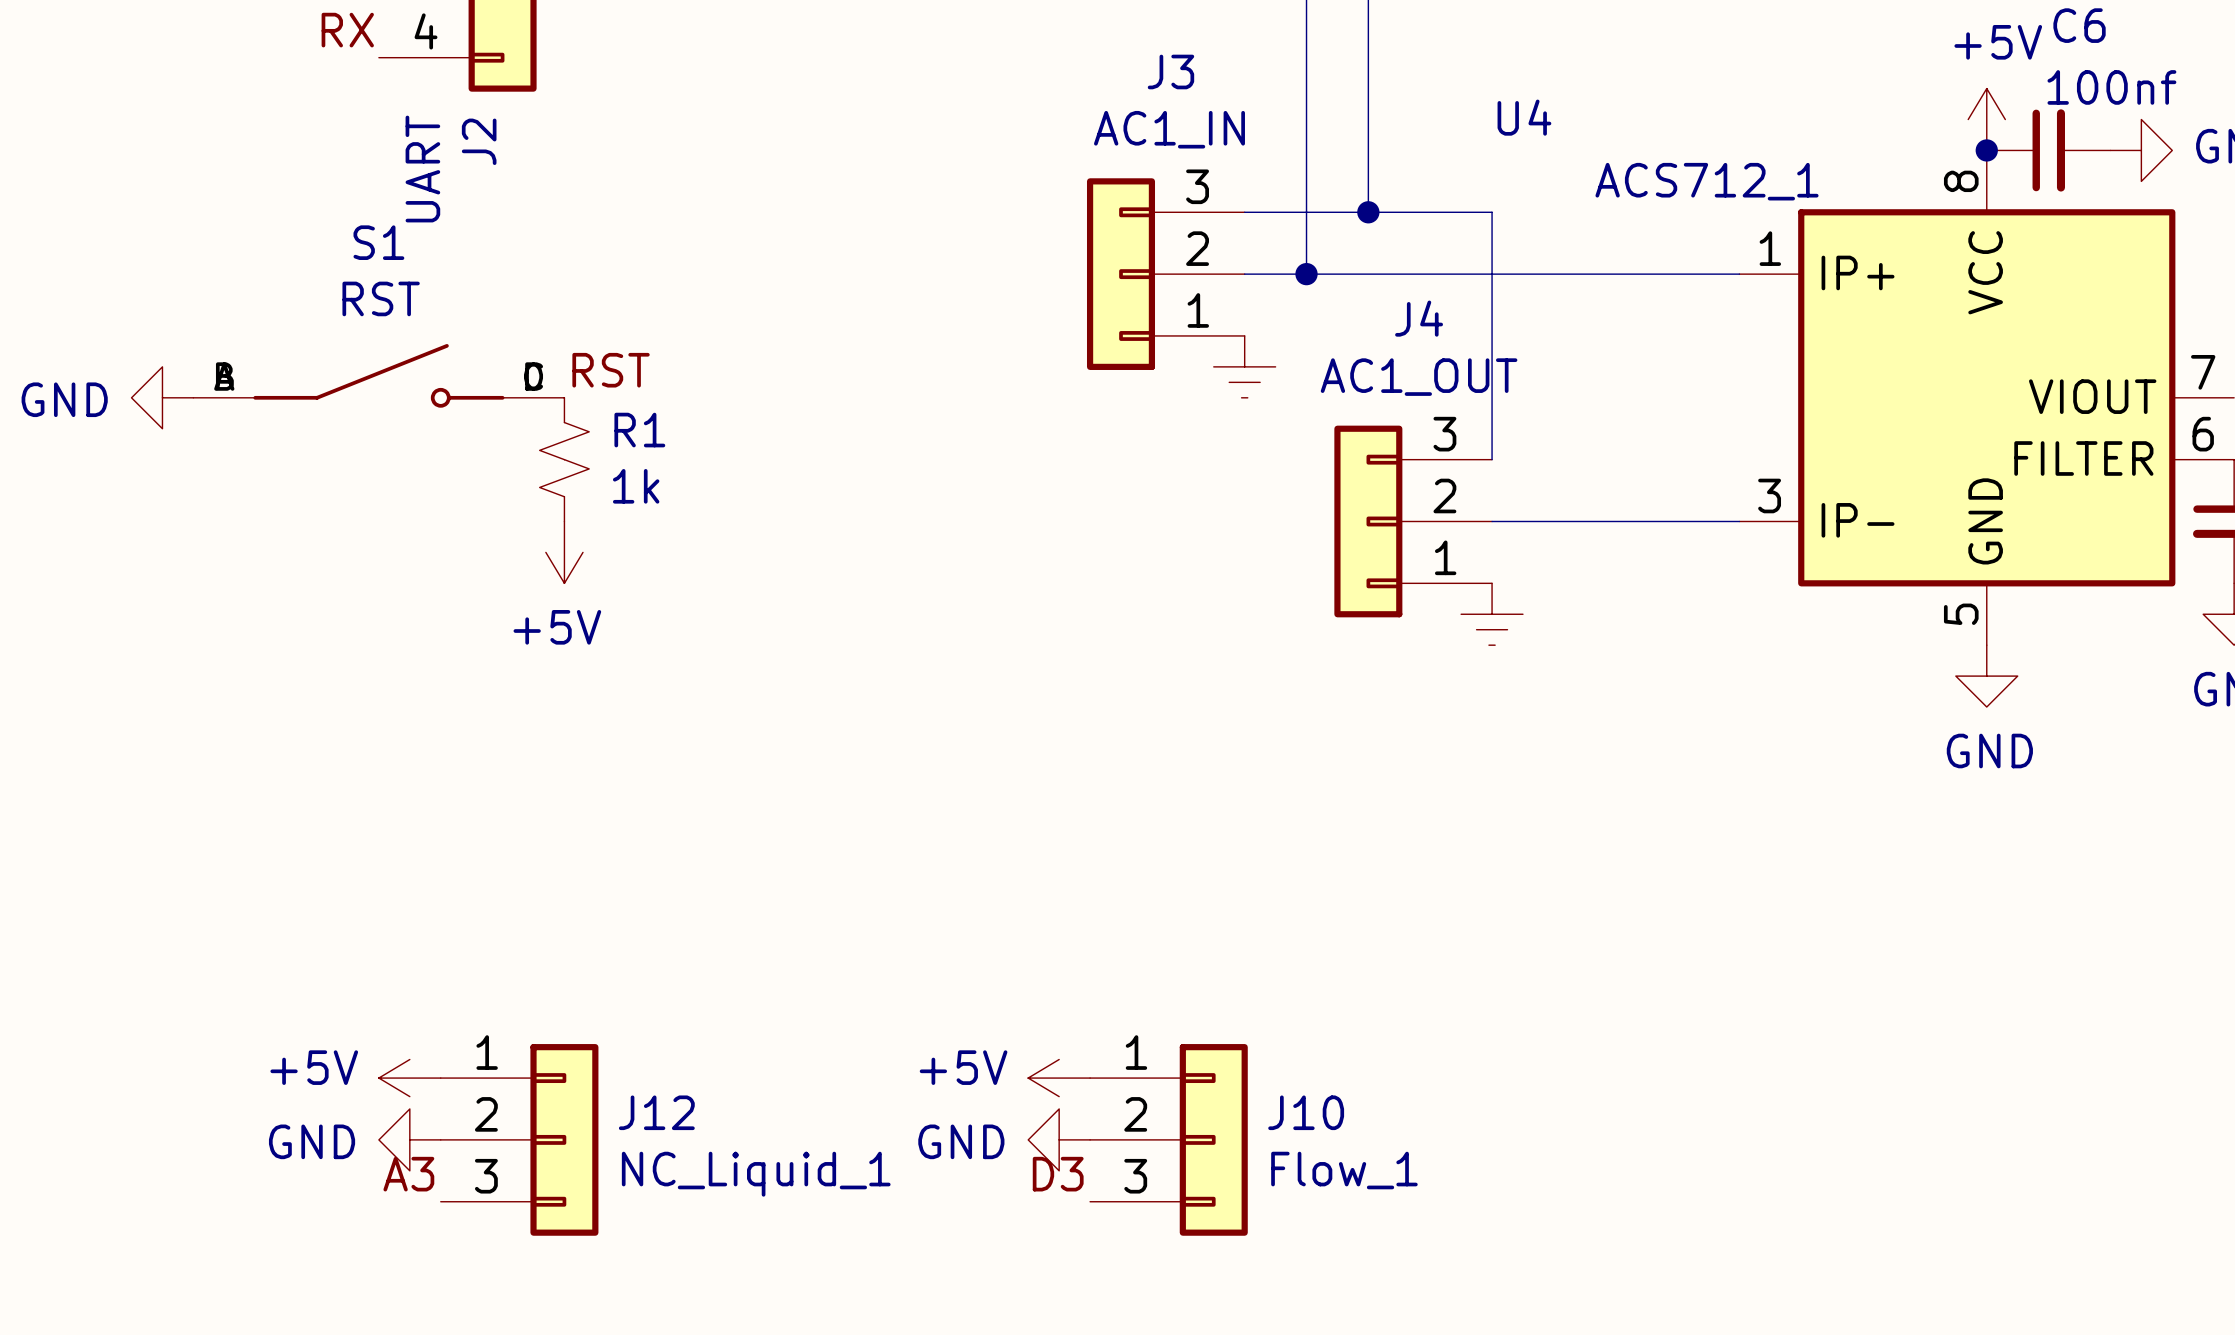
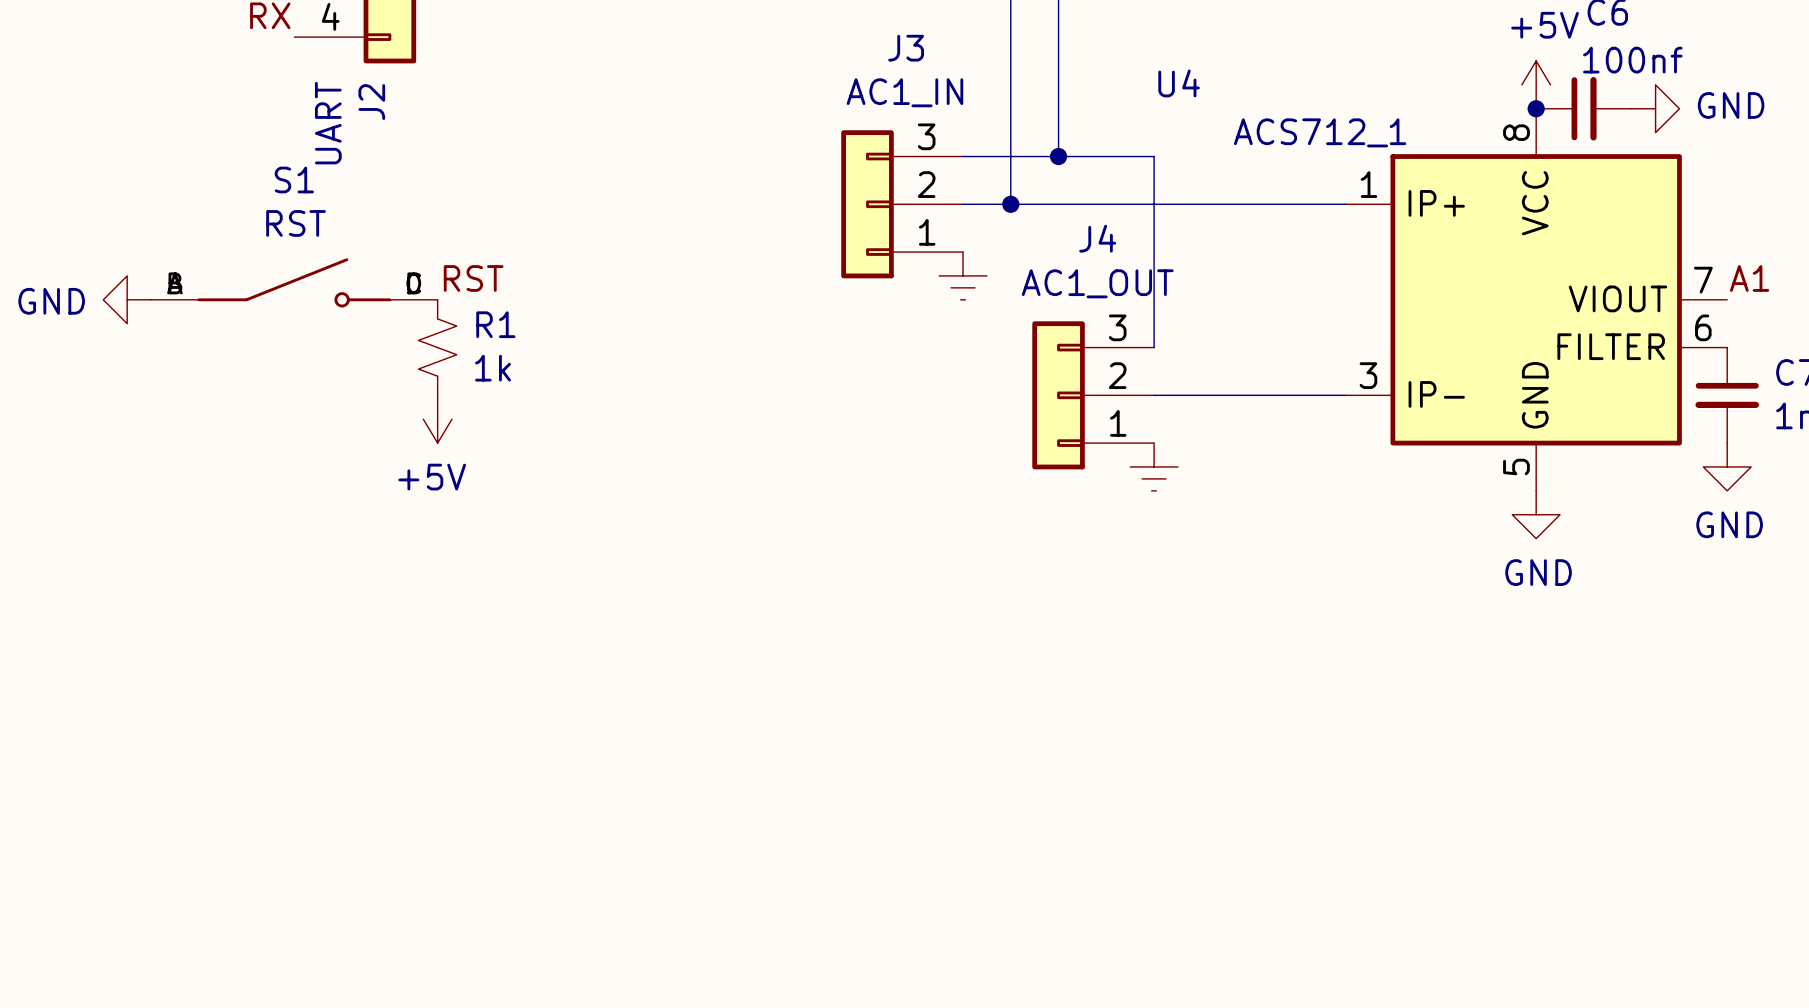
power symbol: +5V (409, 1078) -> none
power symbol: +5V (1059, 1078) -> none
power symbol: GND (409, 1139) -> none
J12: NC_Liquid_1 (519, 1139) -> none
power symbol: GND (1059, 1139) -> none
J10: Flow_1 (1168, 1139) -> none
label: A3 (408, 1174) -> none
label: D3 (1058, 1174) -> none

